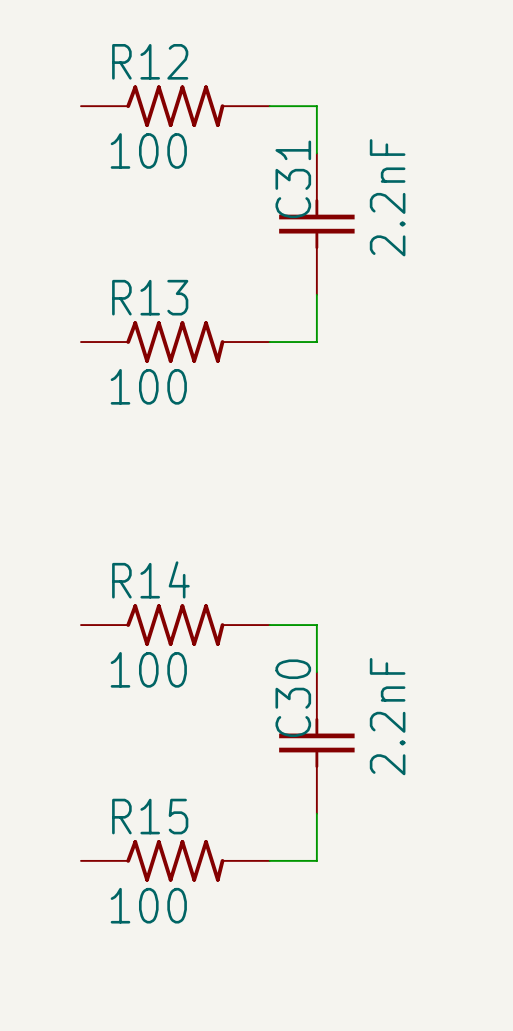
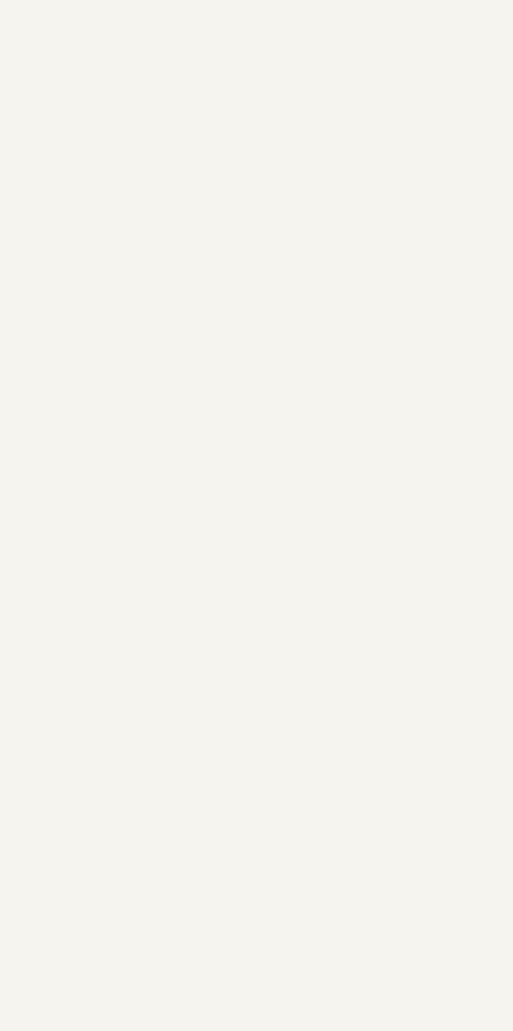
R12: 100 (175, 106) -> none
wire: (269, 106) (316, 106) (316, 153) -> none
C31: 2.2nF (316, 224) -> none
wire: (316, 294) (316, 342) (269, 342) -> none
R13: 100 (175, 342) -> none
R14: 100 (175, 625) -> none
wire: (269, 625) (316, 625) (316, 672) -> none
C30: 2.2nF (316, 742) -> none
wire: (316, 813) (316, 860) (269, 860) -> none
R15: 100 (175, 860) -> none

